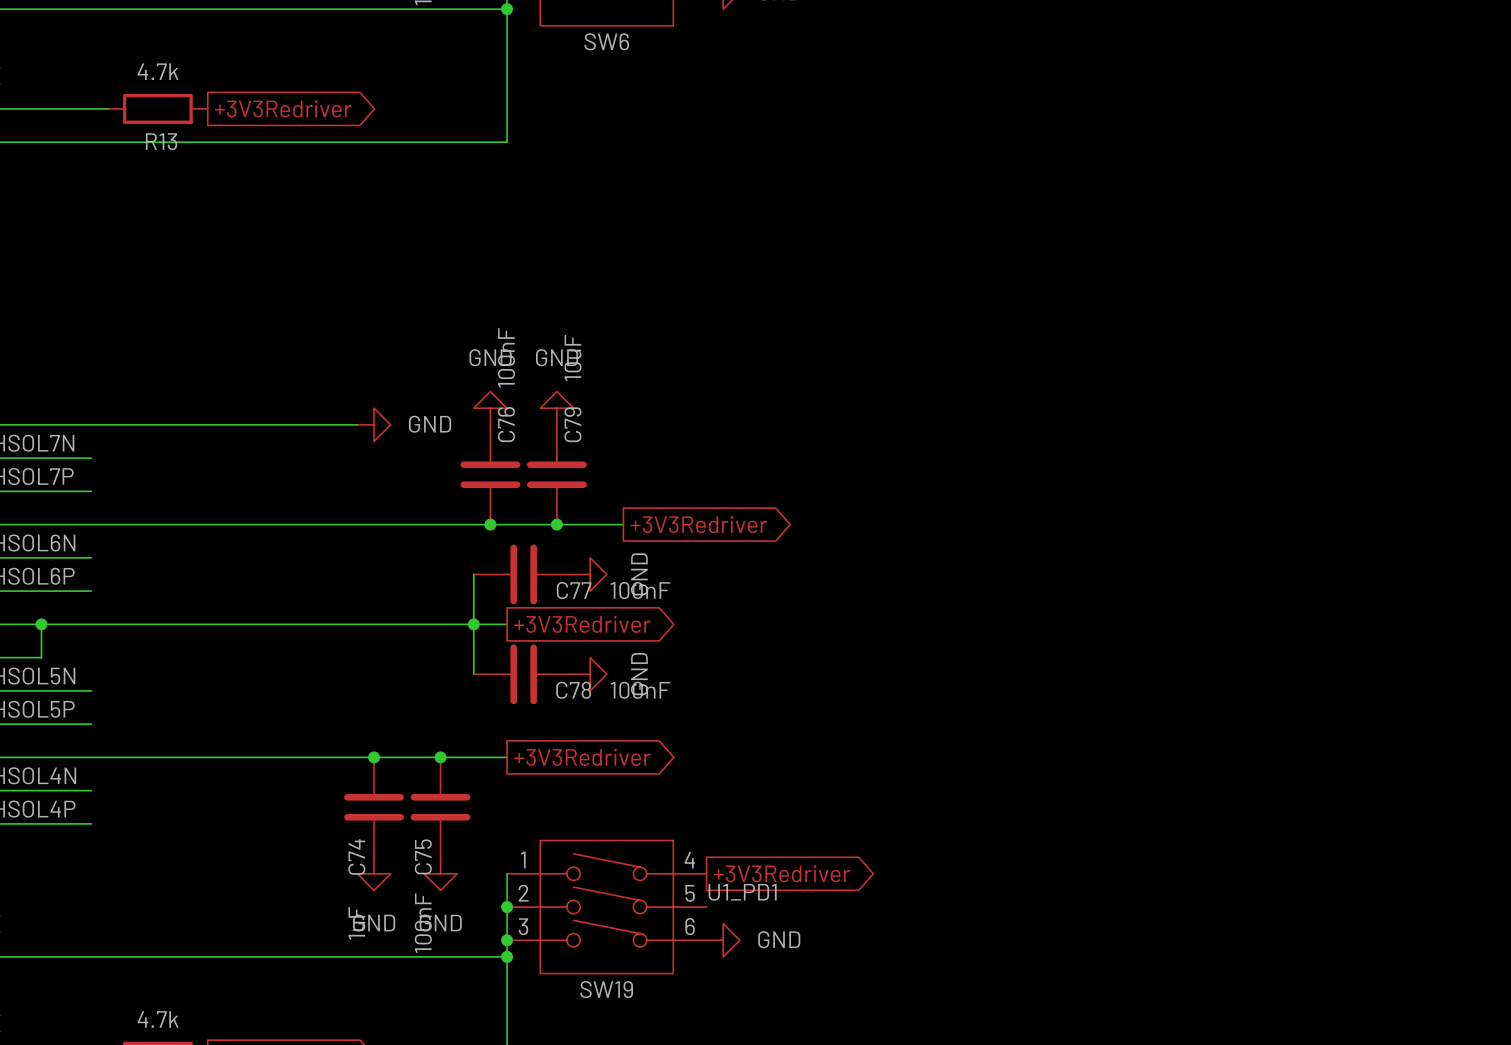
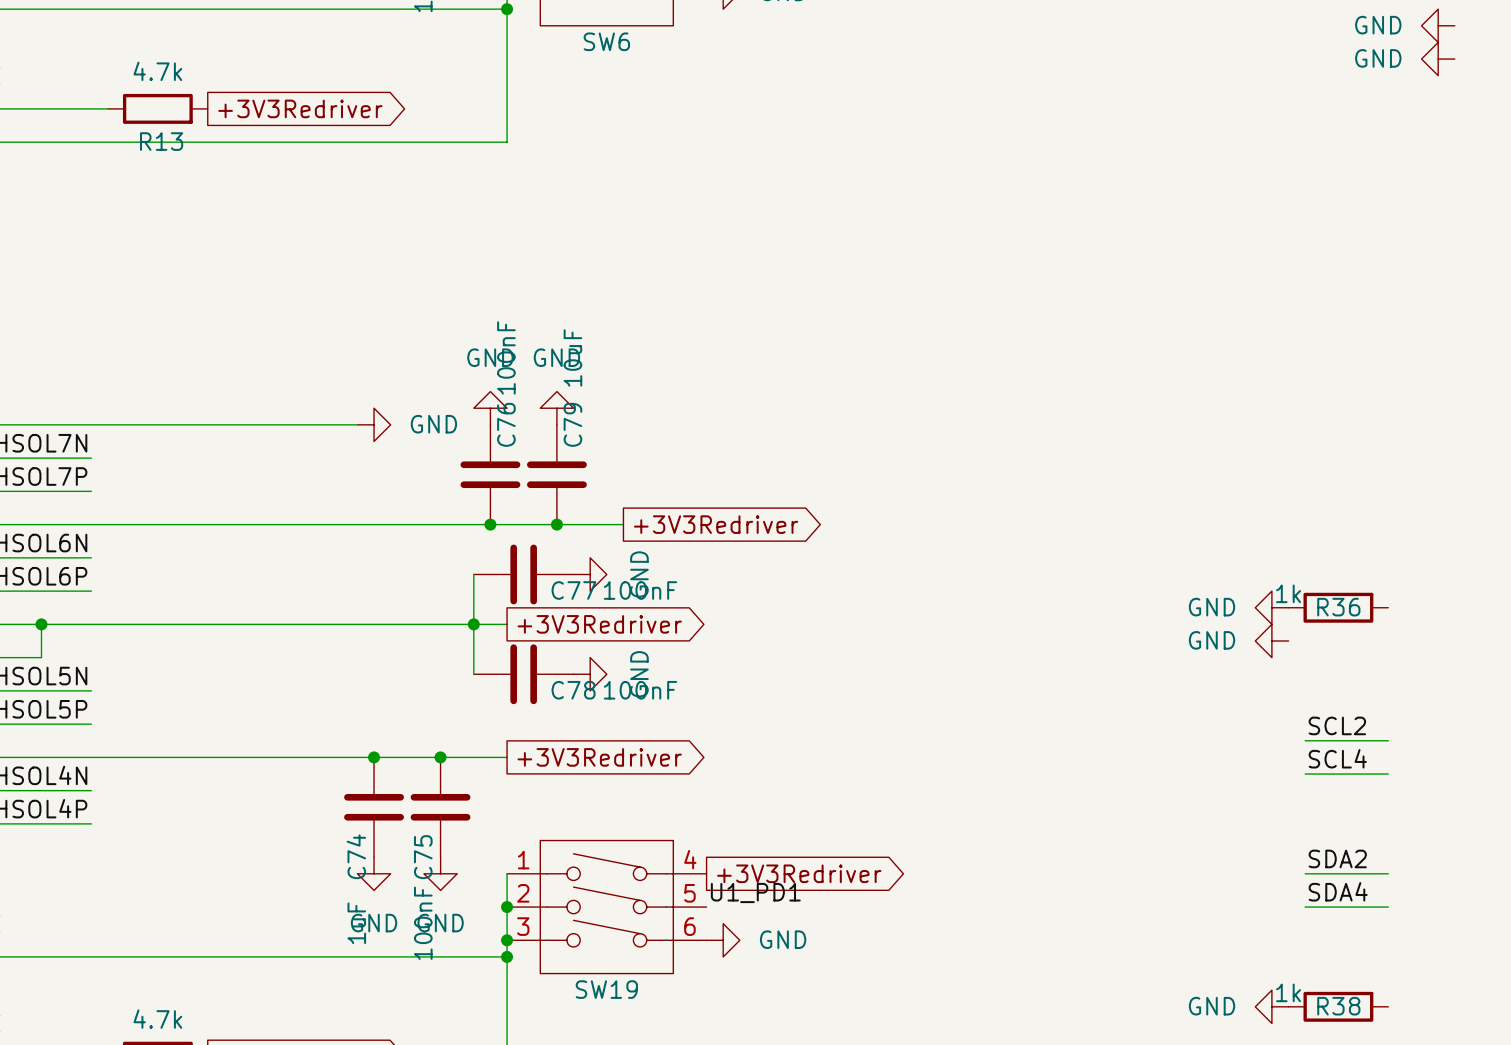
power symbol: none -> GND (1438, 25)
power symbol: none -> GND (1438, 59)
power symbol: none -> GND (1271, 607)
R36: none -> 1k (1338, 607)
power symbol: none -> GND (1271, 641)
label: none -> SCL2 (1337, 725)
wire: none -> (1305, 740) (1388, 740)
label: none -> SCL4 (1337, 758)
wire: none -> (1305, 774) (1388, 774)
label: none -> SDA2 (1337, 858)
wire: none -> (1305, 873) (1388, 873)
label: none -> SDA4 (1338, 891)
wire: none -> (1305, 907) (1388, 907)
power symbol: none -> GND (1271, 1006)
R38: none -> 1k (1338, 1006)

